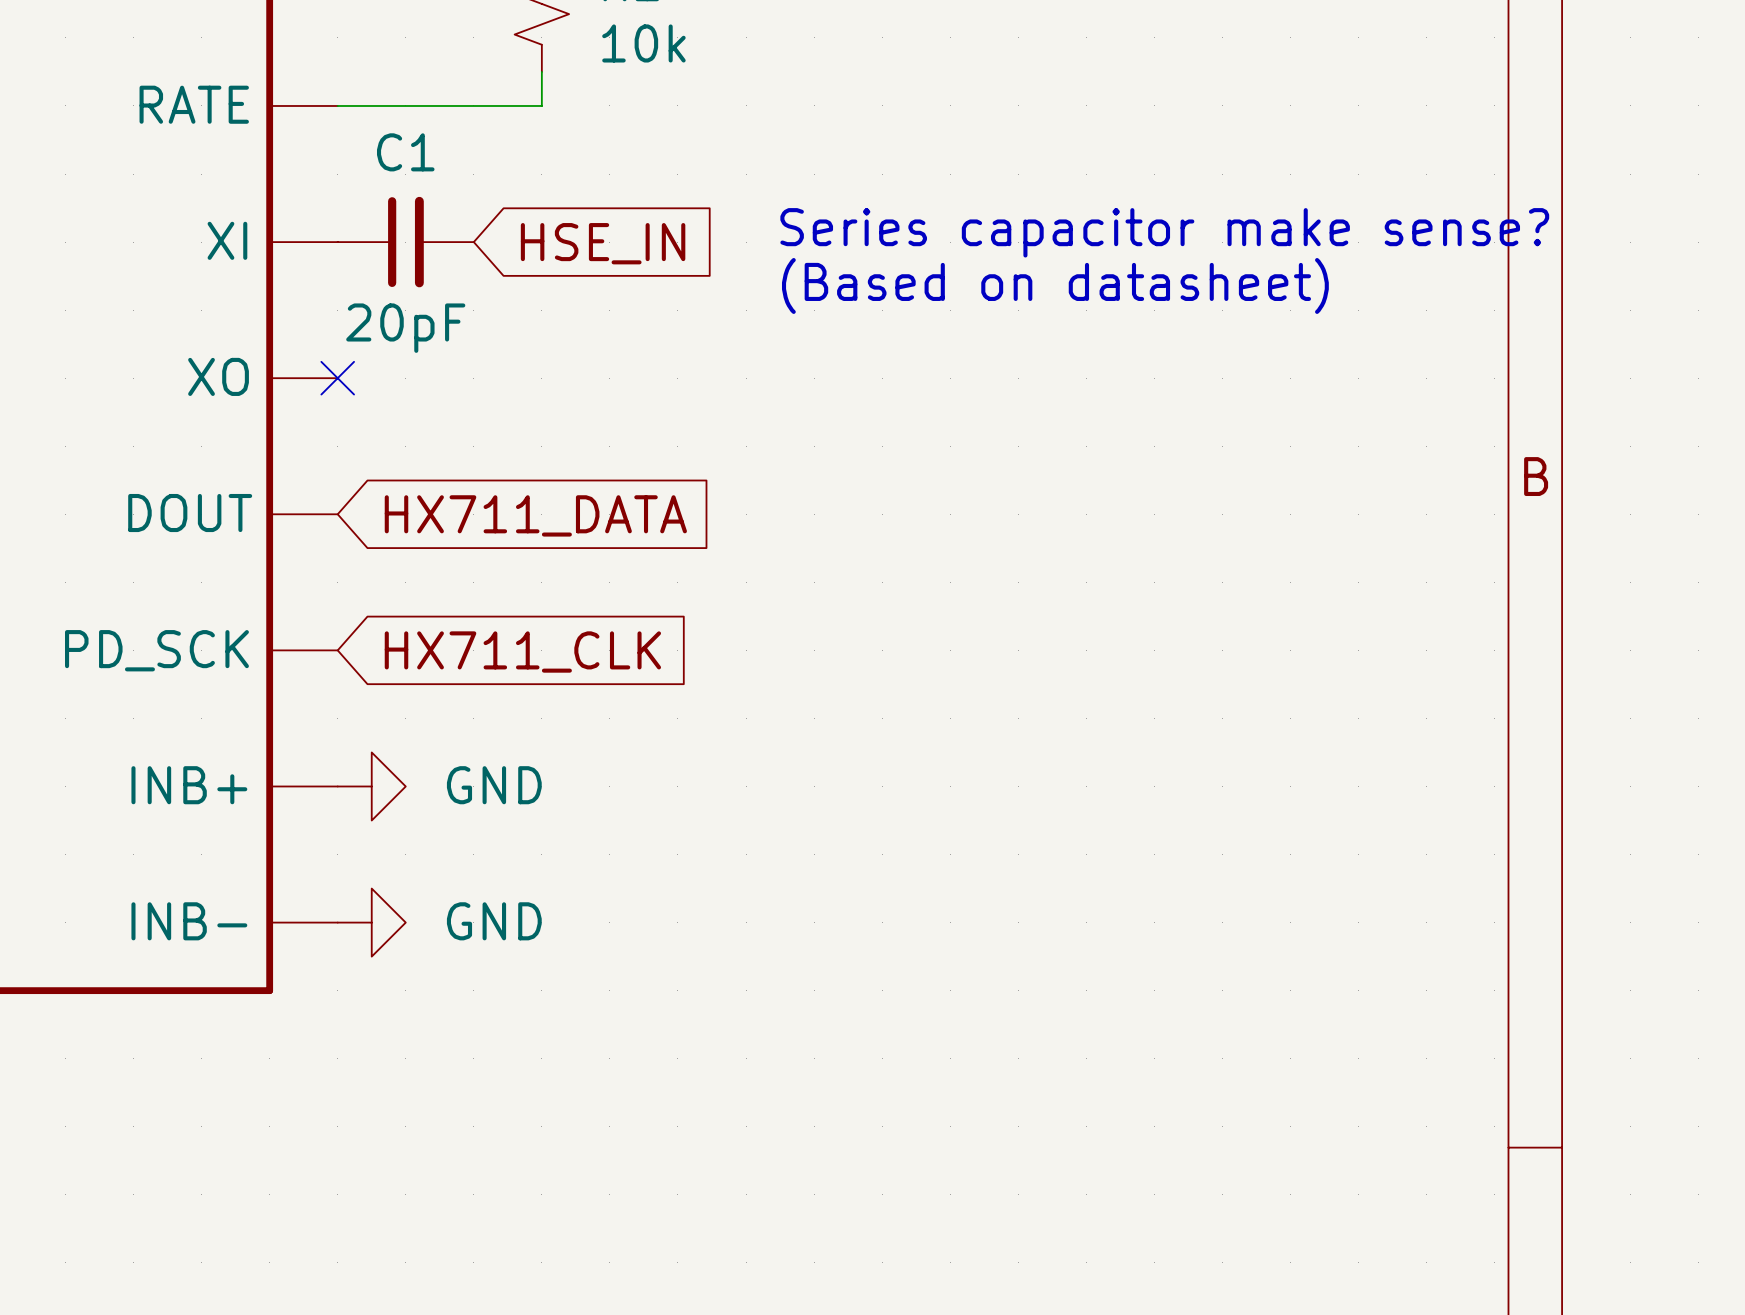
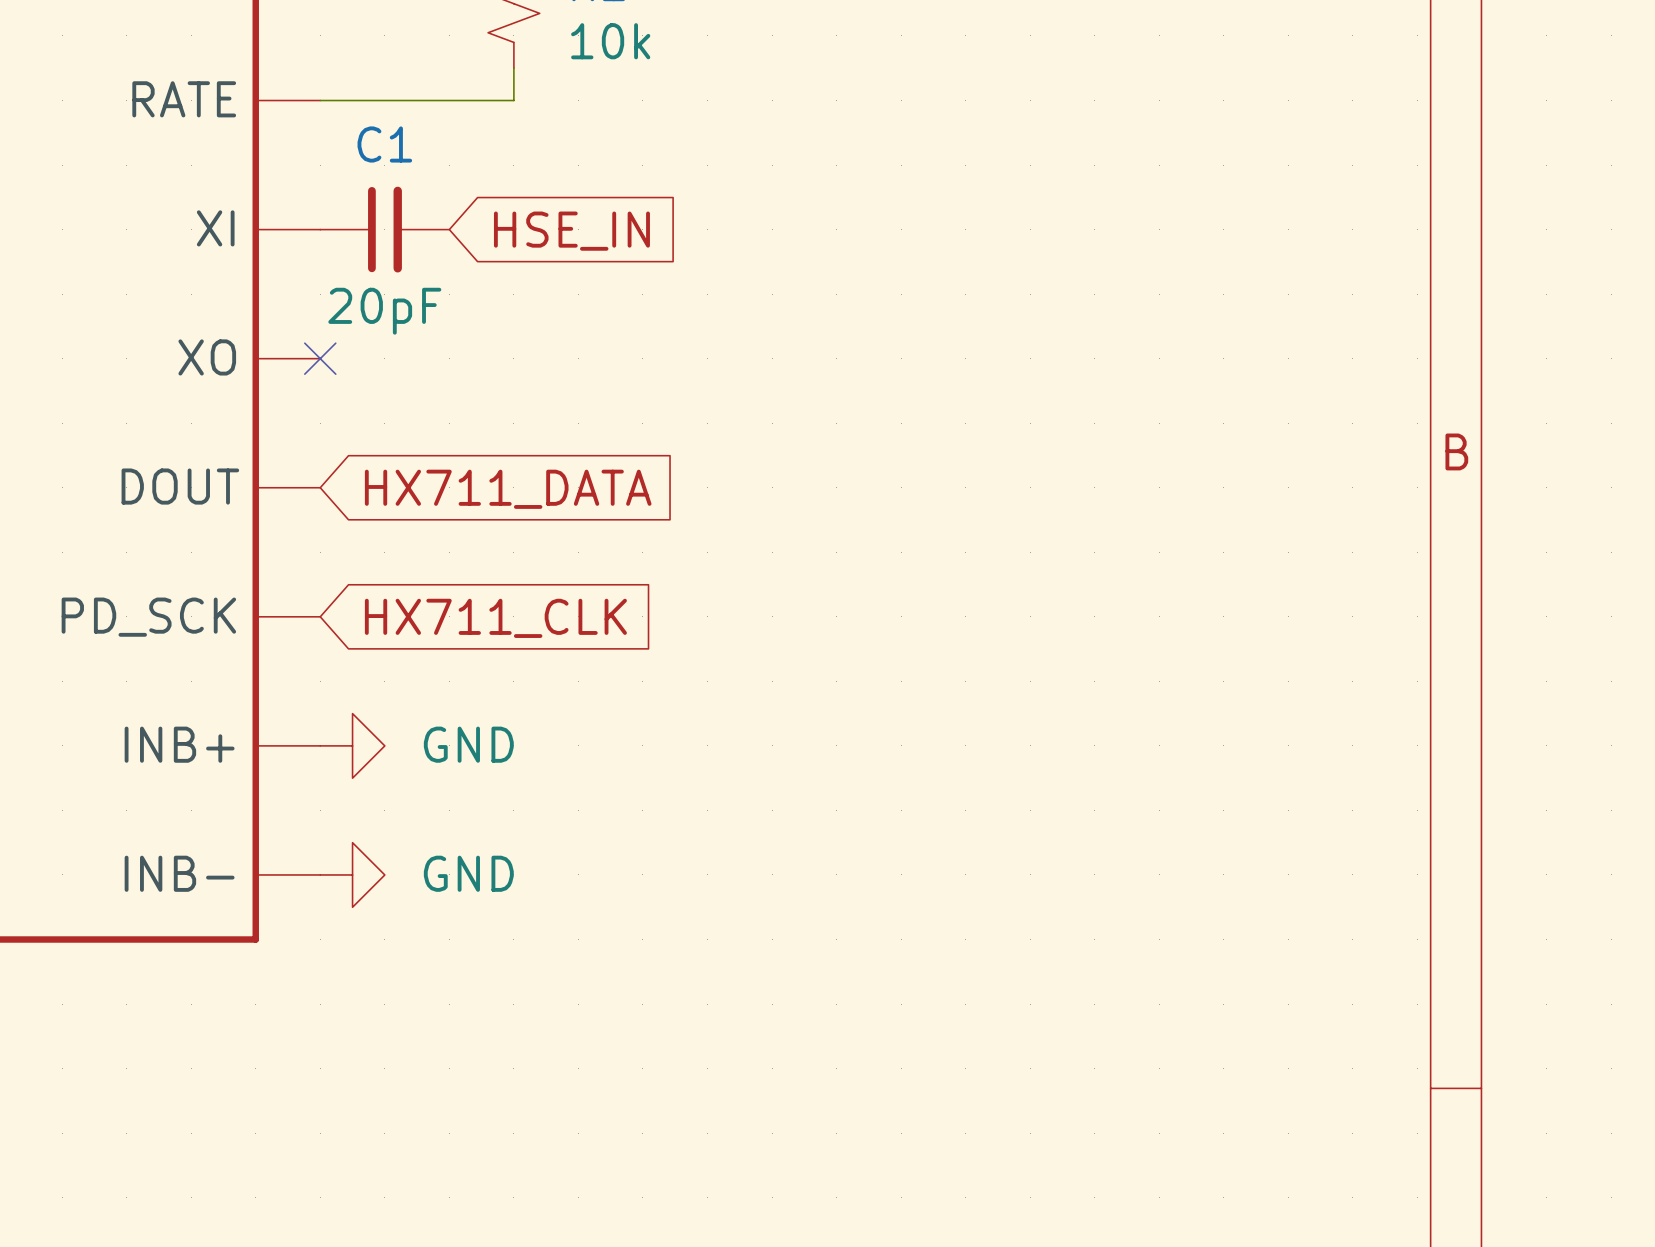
text: Series capacitor make sense? (1164, 232) -> none
text: (Based on datasheet) (1055, 285) -> none

